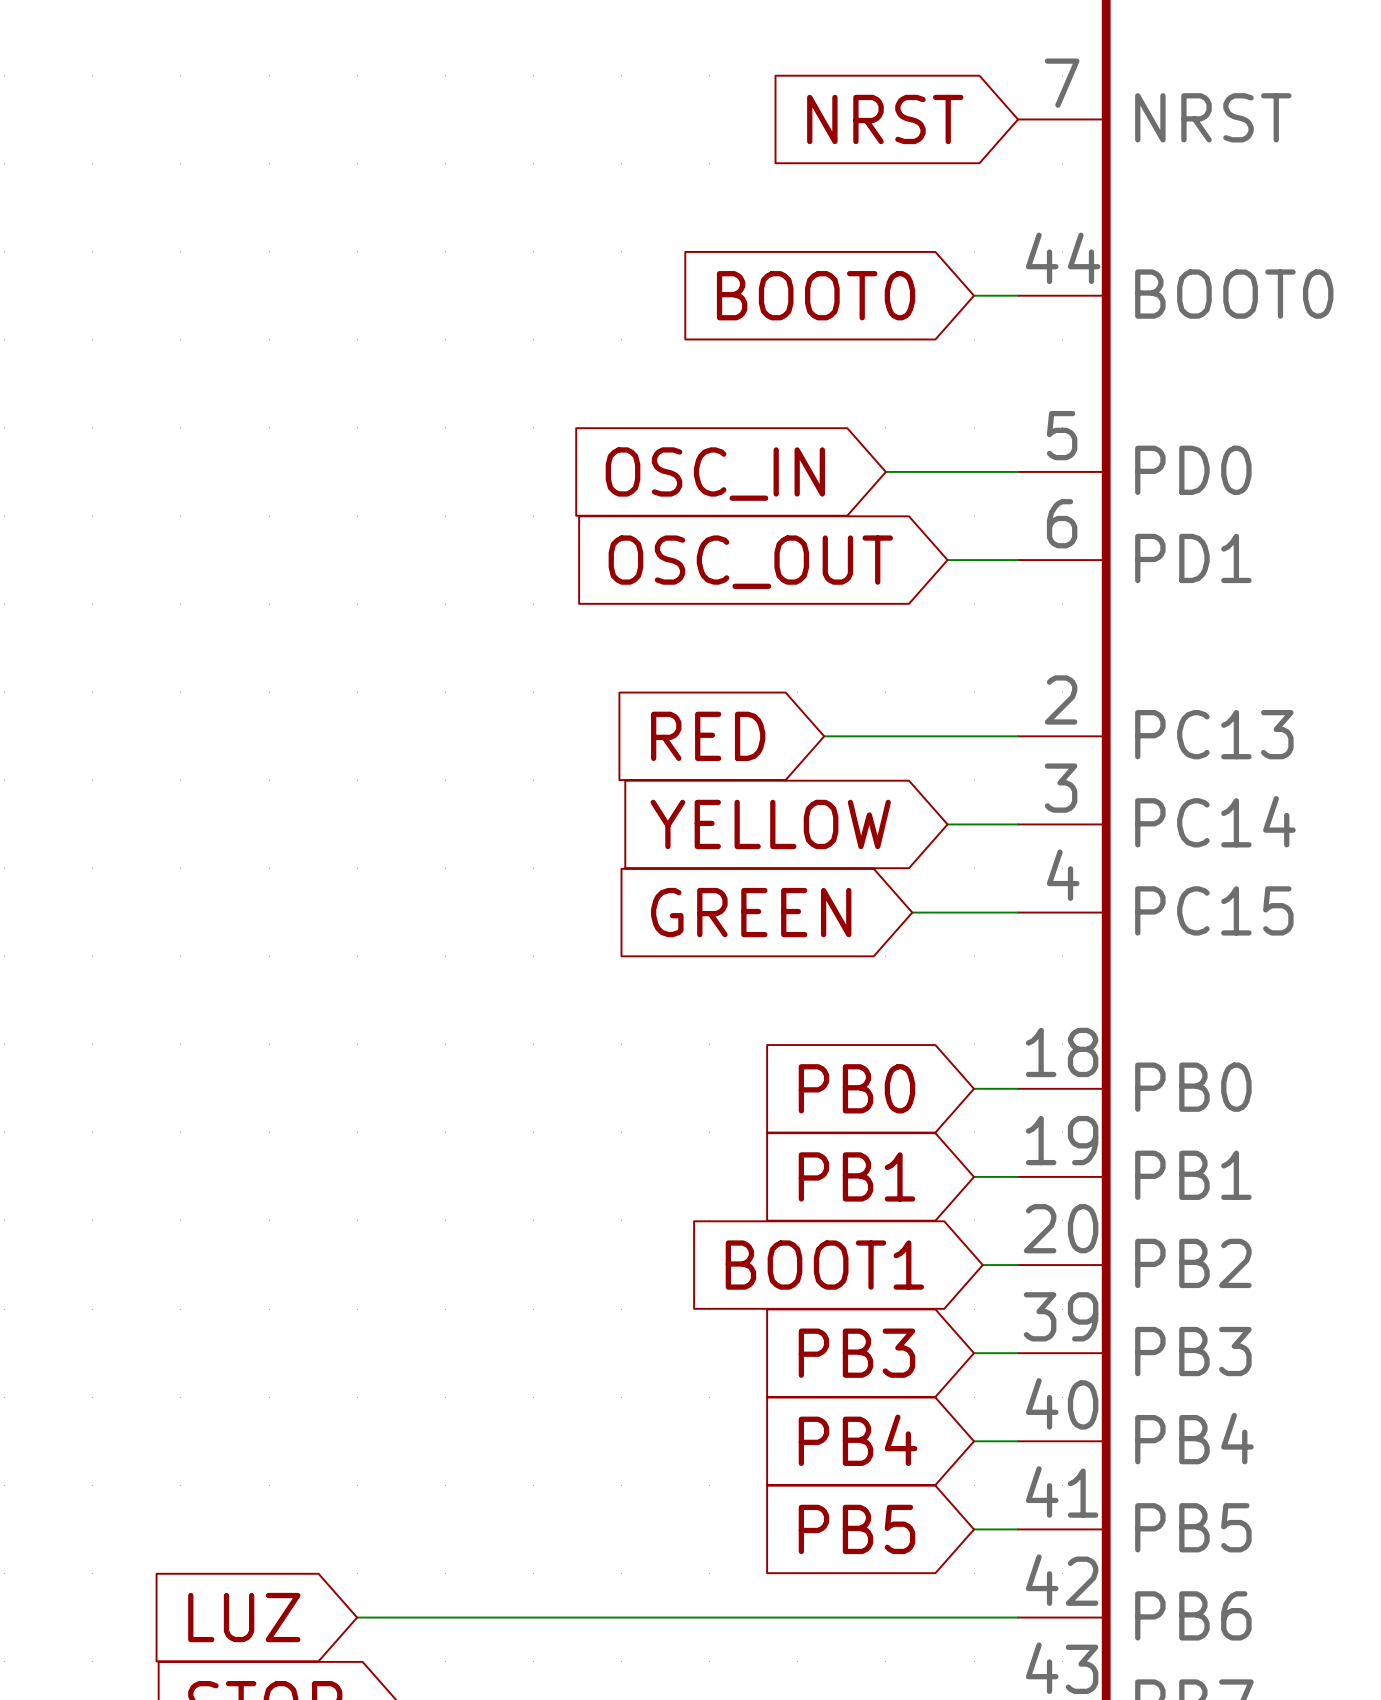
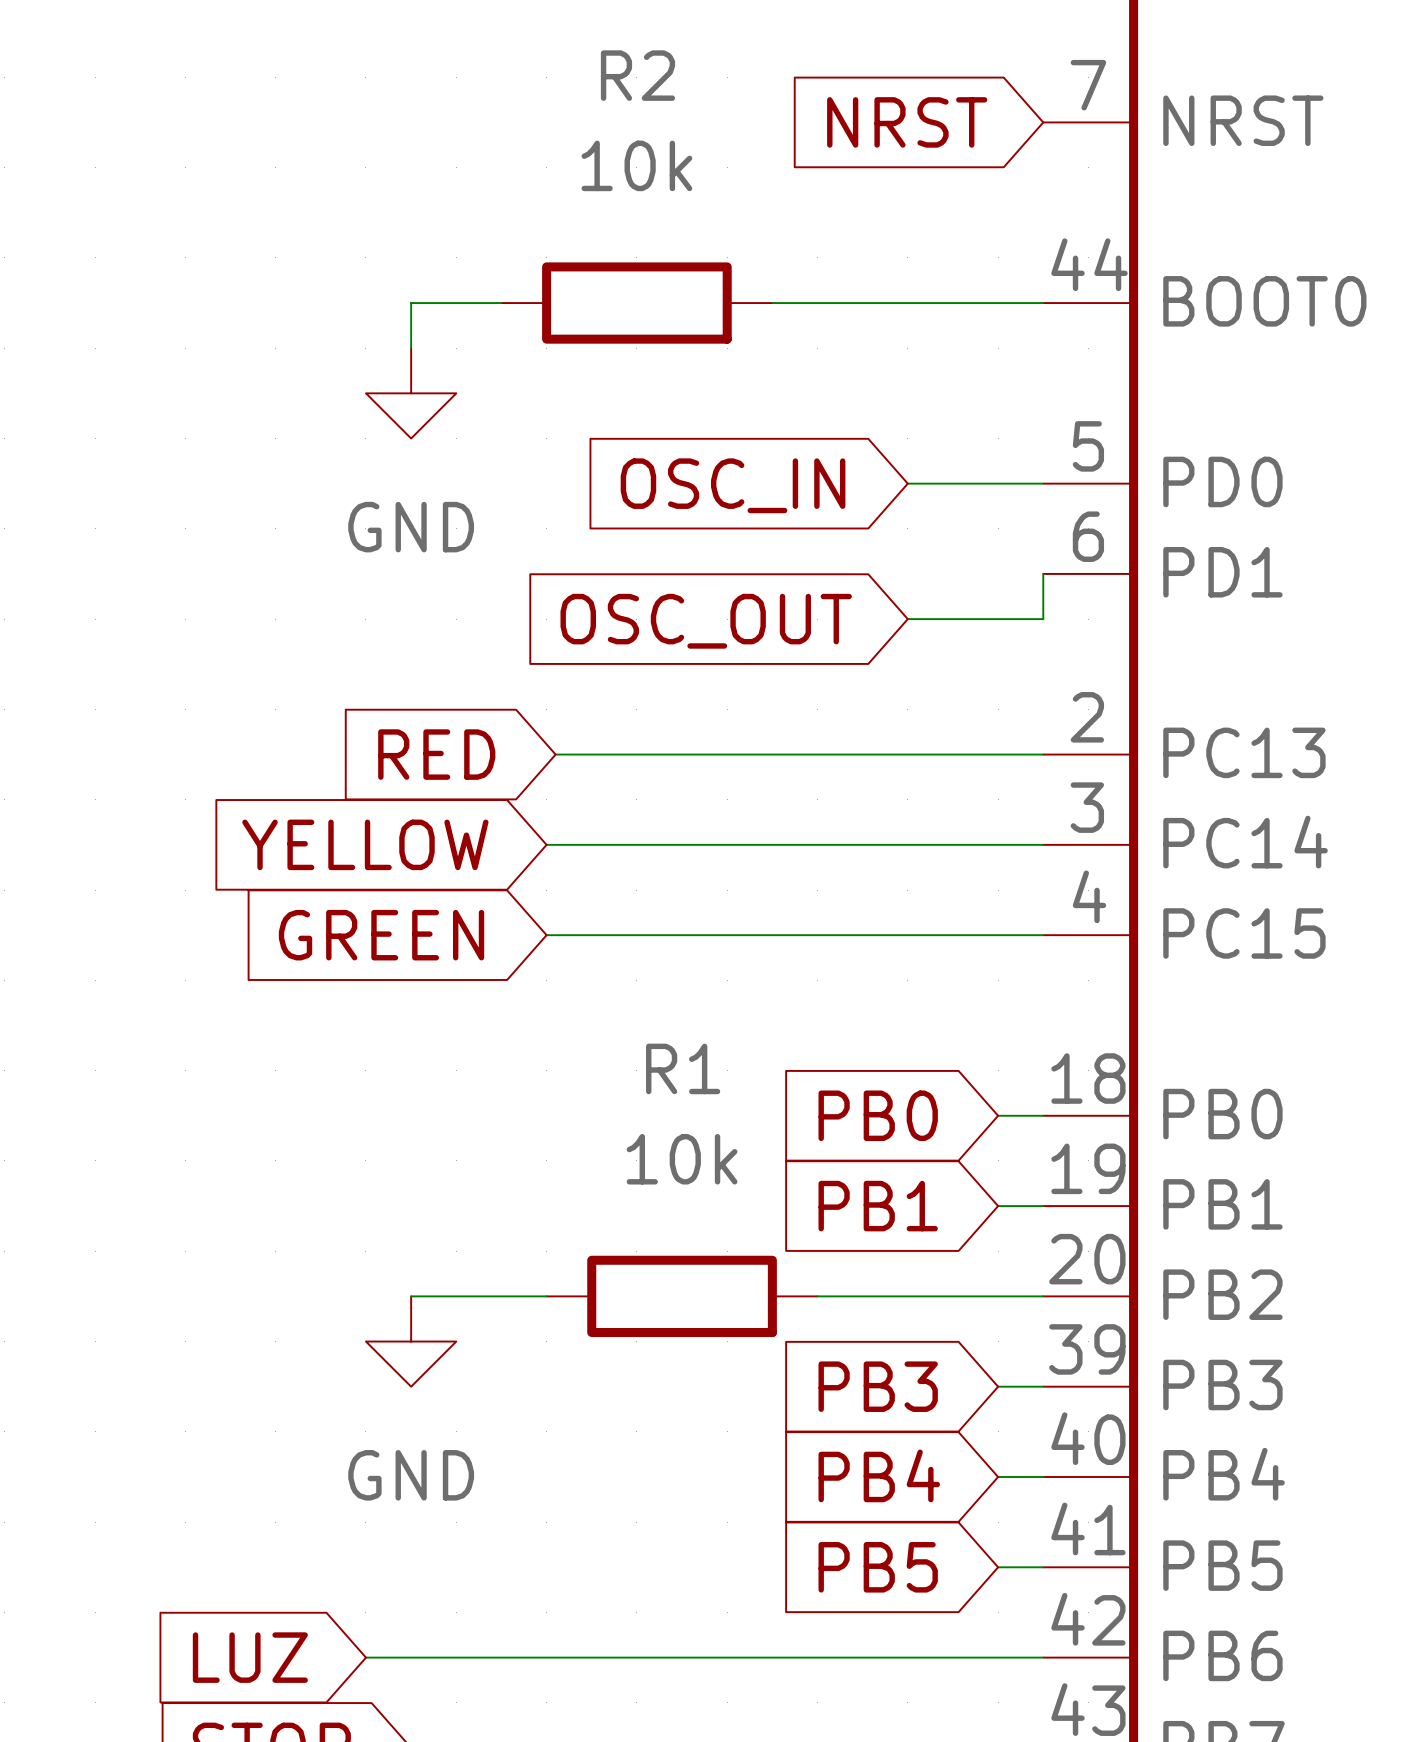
wire: none -> (501, 303) (411, 303) (411, 348)
R2: none -> 10k (636, 303)
wire: none -> (772, 303) (998, 303)
global label: BOOT0 (816, 295) -> none
power symbol: none -> GND (411, 393)
wire: (947, 560) (1018, 560) -> (907, 619) (1043, 619) (1043, 573)
global label position: OSC_OUT (750, 562) -> OSC_OUT (706, 621)
wire: none -> (555, 754) (844, 754)
global label position: RED (708, 736) -> RED (436, 754)
wire: none -> (546, 844) (971, 844)
global label position: YELLOW (770, 824) -> YELLOW (365, 844)
wire: none -> (546, 935) (934, 935)
global label position: GREEN (751, 912) -> GREEN (381, 935)
wire: none -> (411, 1296) (546, 1296)
R1: none -> 10k (682, 1296)
wire: none -> (817, 1296) (1007, 1296)
global label: BOOT1 (824, 1265) -> none
power symbol: none -> GND (411, 1341)

